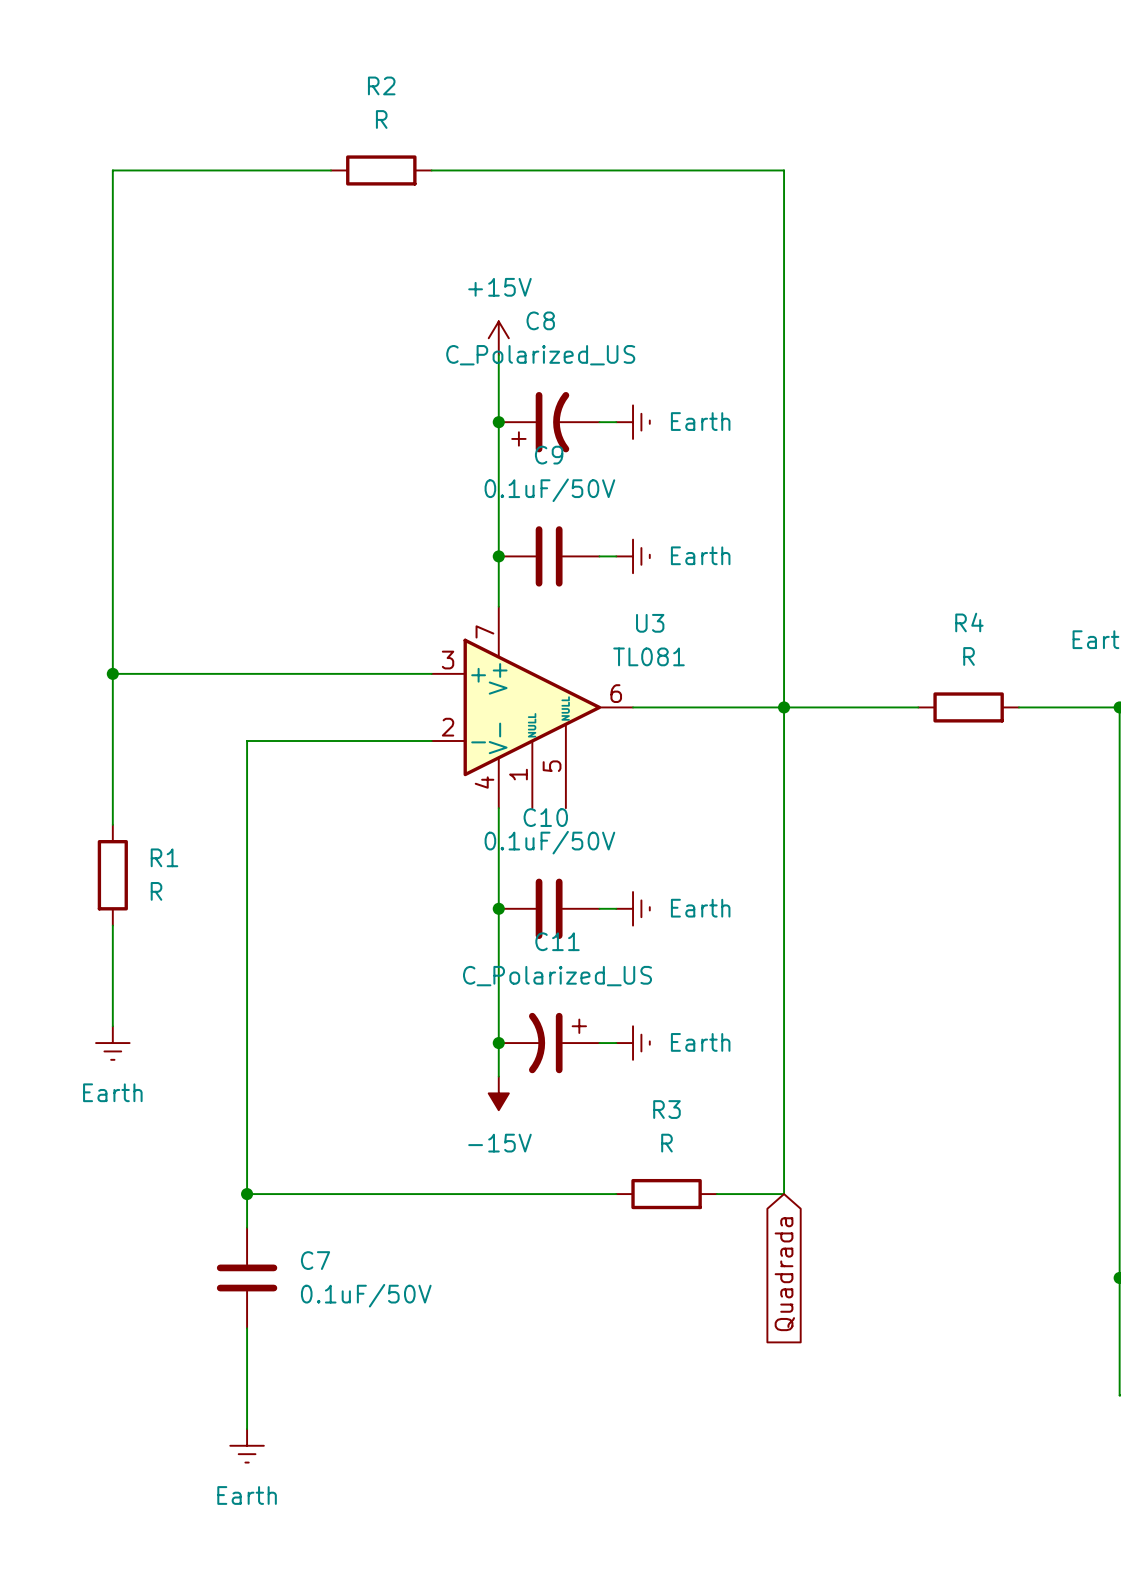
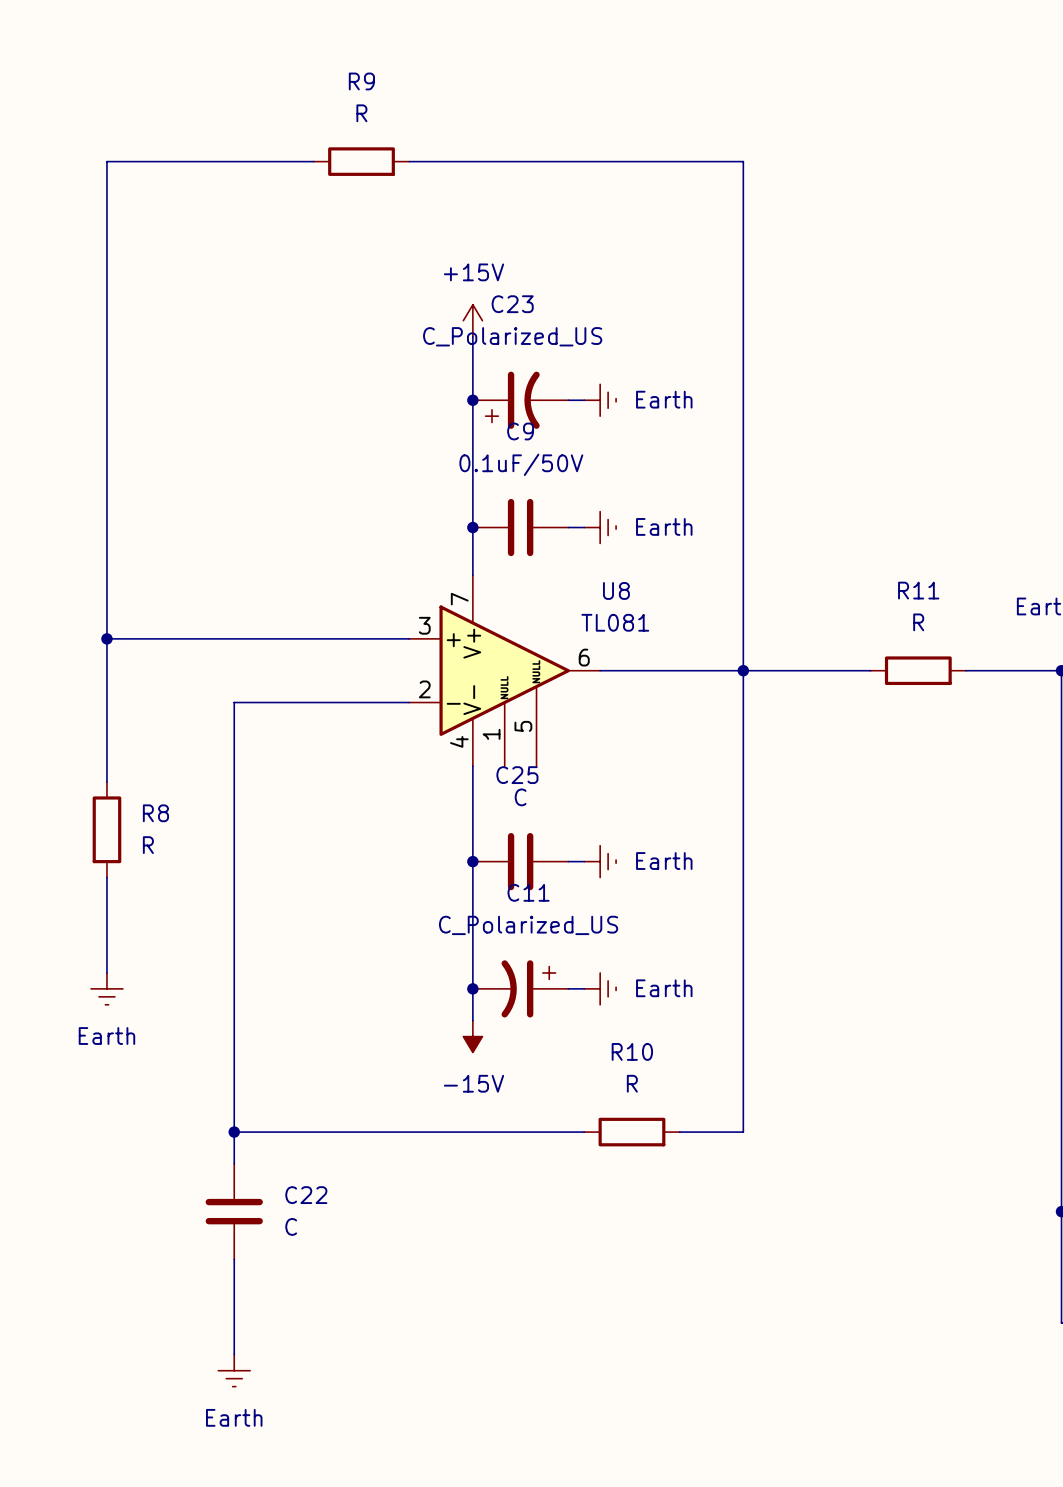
R2 name: R2 (381, 85) -> R9 (361, 81)
C8 name: C8 (540, 320) -> C23 (512, 304)
R4 name: R4 (969, 622) -> R11 (918, 590)
U3 name: U3 (650, 623) -> U8 (616, 590)
C10 name: C10 (545, 817) -> C25 (517, 775)
C10 value: 0.1uF/50V (549, 842) -> C (520, 797)
R1 name: R1 (164, 857) -> R8 (155, 813)
R3 name: R3 (666, 1109) -> R10 (632, 1051)
C7 name: C7 (315, 1260) -> C22 (306, 1195)
global label: Quadrada (784, 1274) -> none
C7 value: 0.1uF/50V (366, 1295) -> C (291, 1226)

